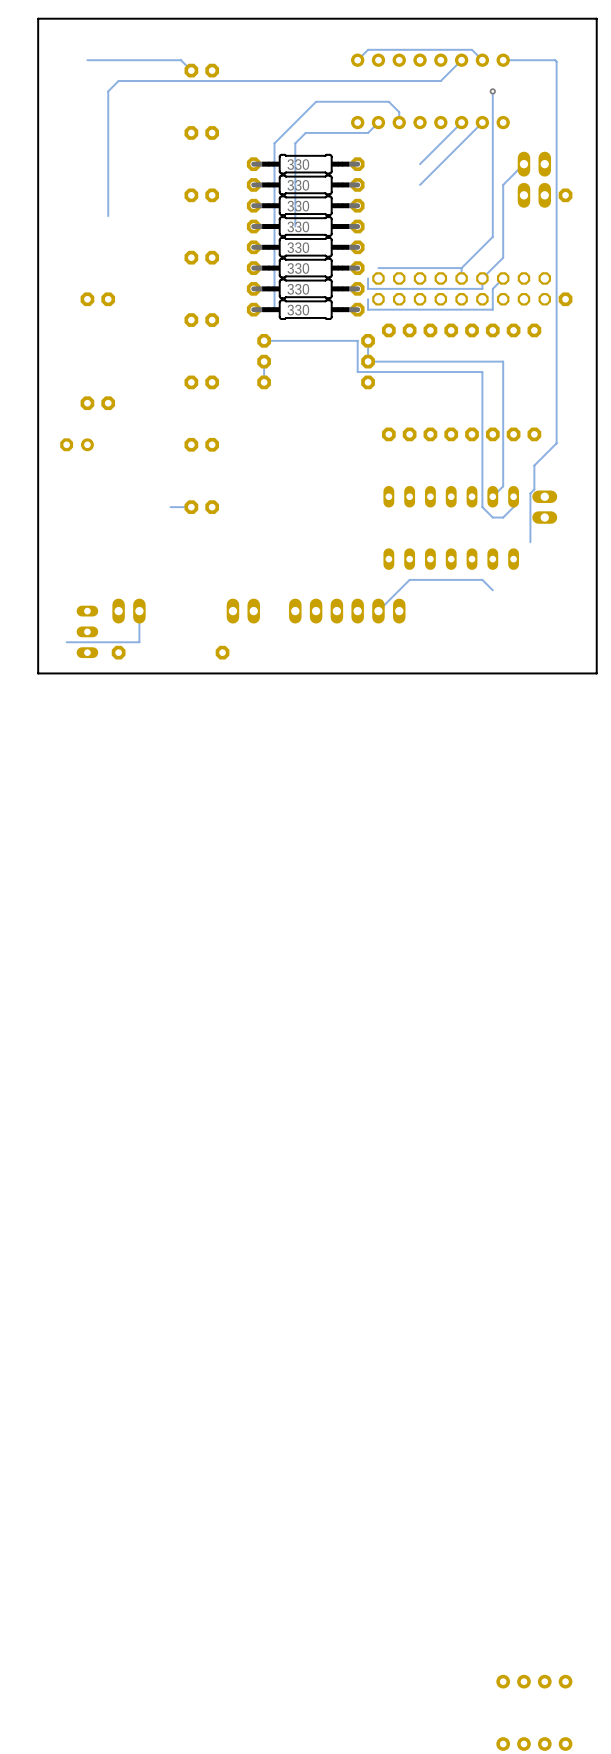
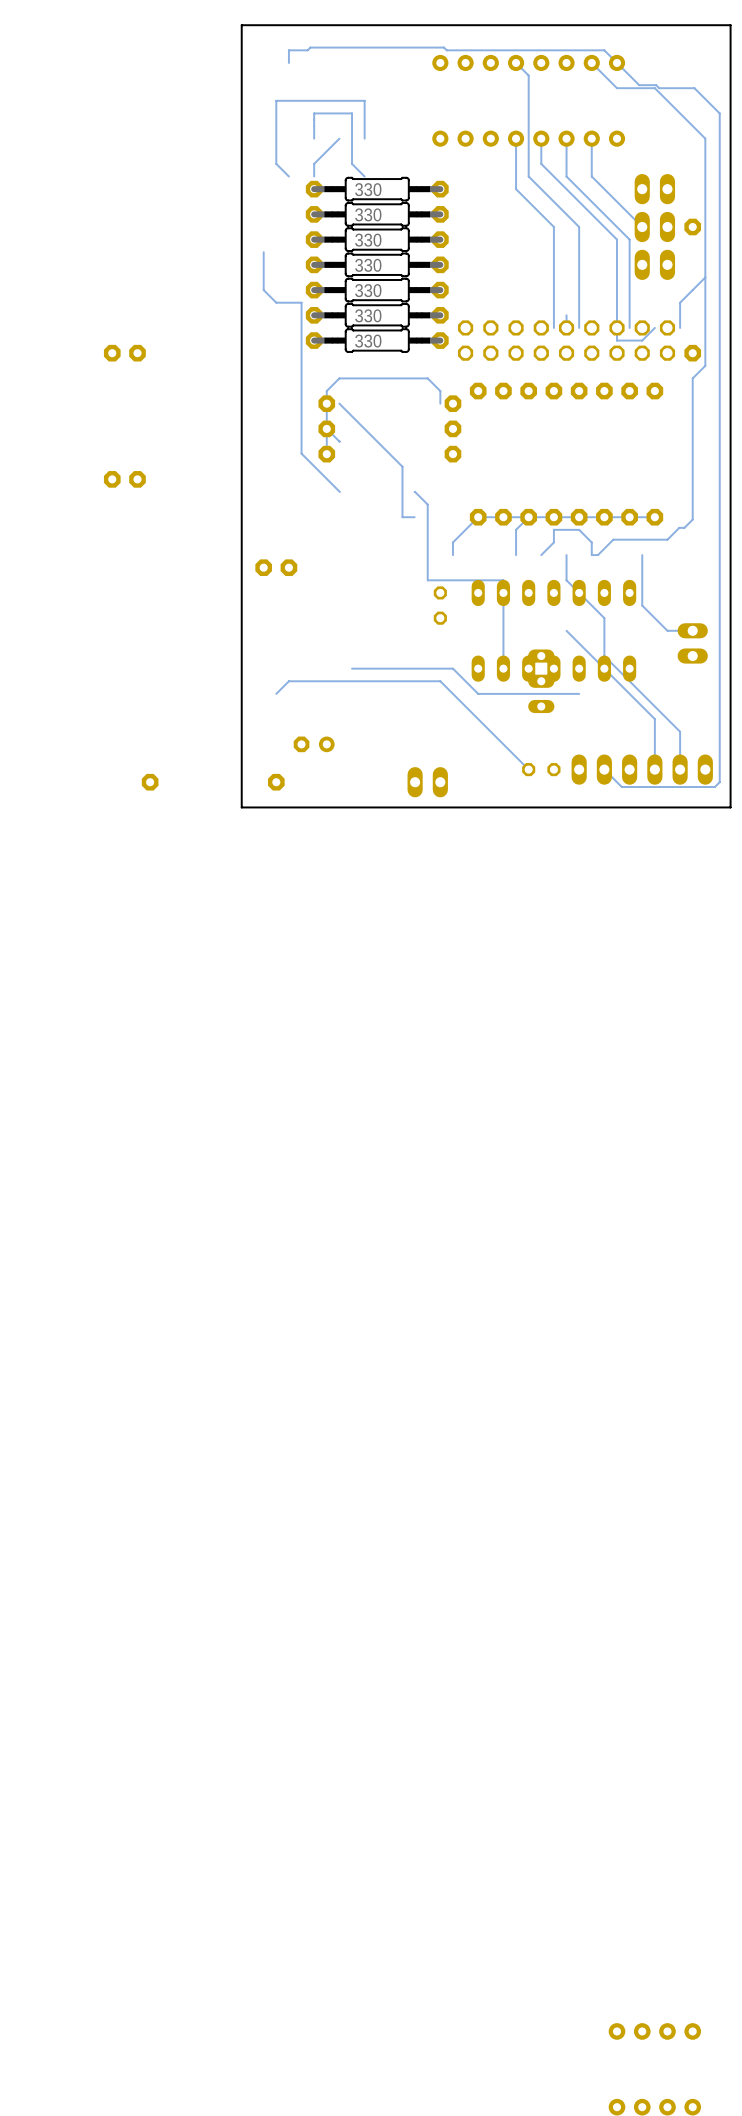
board edge: (596, 29) (596, 18) (38, 18) (38, 673) (194, 673) -> (730, 25) (241, 25) (241, 807)
track: (368, 49) (357, 60) -> (452, 50) (446, 50) (444, 47) (310, 47) (307, 50) (288, 50) (288, 62)
track: (472, 49) (482, 60) -> (591, 555) (597, 555) (613, 539) (667, 539) (679, 527) (684, 527) (692, 519) (692, 378) (705, 365) (705, 138) (654, 88) (617, 88) (591, 62)
track: none -> (579, 50) (604, 50) (639, 85) (656, 85) (659, 88) (694, 88) (719, 113) (719, 782) (714, 787) (621, 787) (604, 769)
track: (87, 60) (180, 60) (191, 70) -> none
track: none -> (516, 62) (528, 75) (528, 176) (579, 227) (579, 327)
track: (461, 60) (440, 80) (118, 80) (108, 91) (108, 216) -> none
track: (503, 60) (556, 61) (556, 443) (534, 465) (534, 489) (530, 493) (530, 542) -> none
part: (201, 70) -> none
track: (492, 91) (492, 236) (461, 268) (378, 268) -> none
via: (492, 91) -> none
track: none -> (314, 138) (314, 113) (352, 113) (352, 163) (364, 176)
track: none -> (339, 138) (314, 163) (314, 176)
track: none -> (364, 138) (364, 100) (276, 100) (276, 163) (288, 176)
track: (378, 122) (368, 132) (305, 132) (295, 143) (295, 226) -> none
track: (399, 122) (399, 112) (388, 101) (316, 101) (274, 143) (274, 309) -> none
track: none -> (516, 138) (516, 189) (553, 227) (553, 327)
track: (461, 122) (420, 164) -> (566, 138) (566, 176) (629, 239) (629, 327)
track: (482, 122) (420, 184) -> (591, 138) (591, 176) (642, 227)
part: (201, 132) -> none
track: (523, 164) (503, 184) (503, 205) -> (541, 138) (541, 163) (617, 239)
part: (201, 195) -> none
track: none -> (263, 252) (263, 290) (276, 302) (301, 302) (301, 453) (339, 491)
part: none -> (654, 264)
track: none -> (705, 277) (680, 302) (680, 327)
part: (201, 257) -> none
track: (503, 257) (482, 278) (482, 288) (368, 288) (368, 278) -> (617, 302) (617, 340) (642, 340) (654, 327)
track: (503, 278) (492, 288) (492, 309) (368, 309) (368, 299) -> none
part: 330 (305, 309) -> none
part: (201, 320) -> none
track: (264, 340) (357, 340) (357, 372) (482, 372) (482, 455) -> (541, 555) (553, 542) (553, 529) (579, 529) (591, 542)
track: none -> (339, 403) (402, 466) (402, 517) (414, 517)
track: none -> (440, 403) (440, 391) (427, 378) (339, 378) (326, 391) (326, 428) (339, 441)
track: (368, 340) (368, 361) (503, 361) (503, 486) (492, 496) -> none
part: (201, 382) -> none
track: none -> (414, 491) (427, 504) (427, 580) (503, 580) (503, 656)
track: none -> (528, 517) (516, 529) (516, 555)
track: none -> (654, 517) (478, 517) (452, 542) (452, 555)
part: (77, 444) -> none
part: (201, 444) -> none
track: (482, 465) (482, 507) -> (566, 555) (566, 580) (591, 605)
track: none -> (642, 555) (642, 605) (667, 630) (692, 630)
part: none -> (276, 567)
track: (513, 496) (513, 507) (503, 517) (492, 517) -> (680, 769) (680, 731) (604, 656) (604, 618)
track: (191, 507) (170, 507) -> none
part: (201, 507) -> none
part: none -> (440, 605)
part position: (544, 507) -> (692, 643)
track: none -> (566, 630) (654, 719) (654, 769)
part: none -> (541, 681)
track: none -> (276, 693) (288, 681) (440, 681) (528, 769)
track: (409, 579) (378, 611) -> (503, 693) (478, 693) (452, 668) (352, 668)
track: (472, 579) (482, 579) (492, 590) -> none
part: (129, 611) -> none
track: (139, 611) (139, 642) (66, 642) -> none
part: (243, 611) -> none
part position: (347, 611) -> (642, 769)
part: none -> (314, 744)
part: (87, 631) -> none
part: none -> (541, 769)
part: none -> (427, 782)

